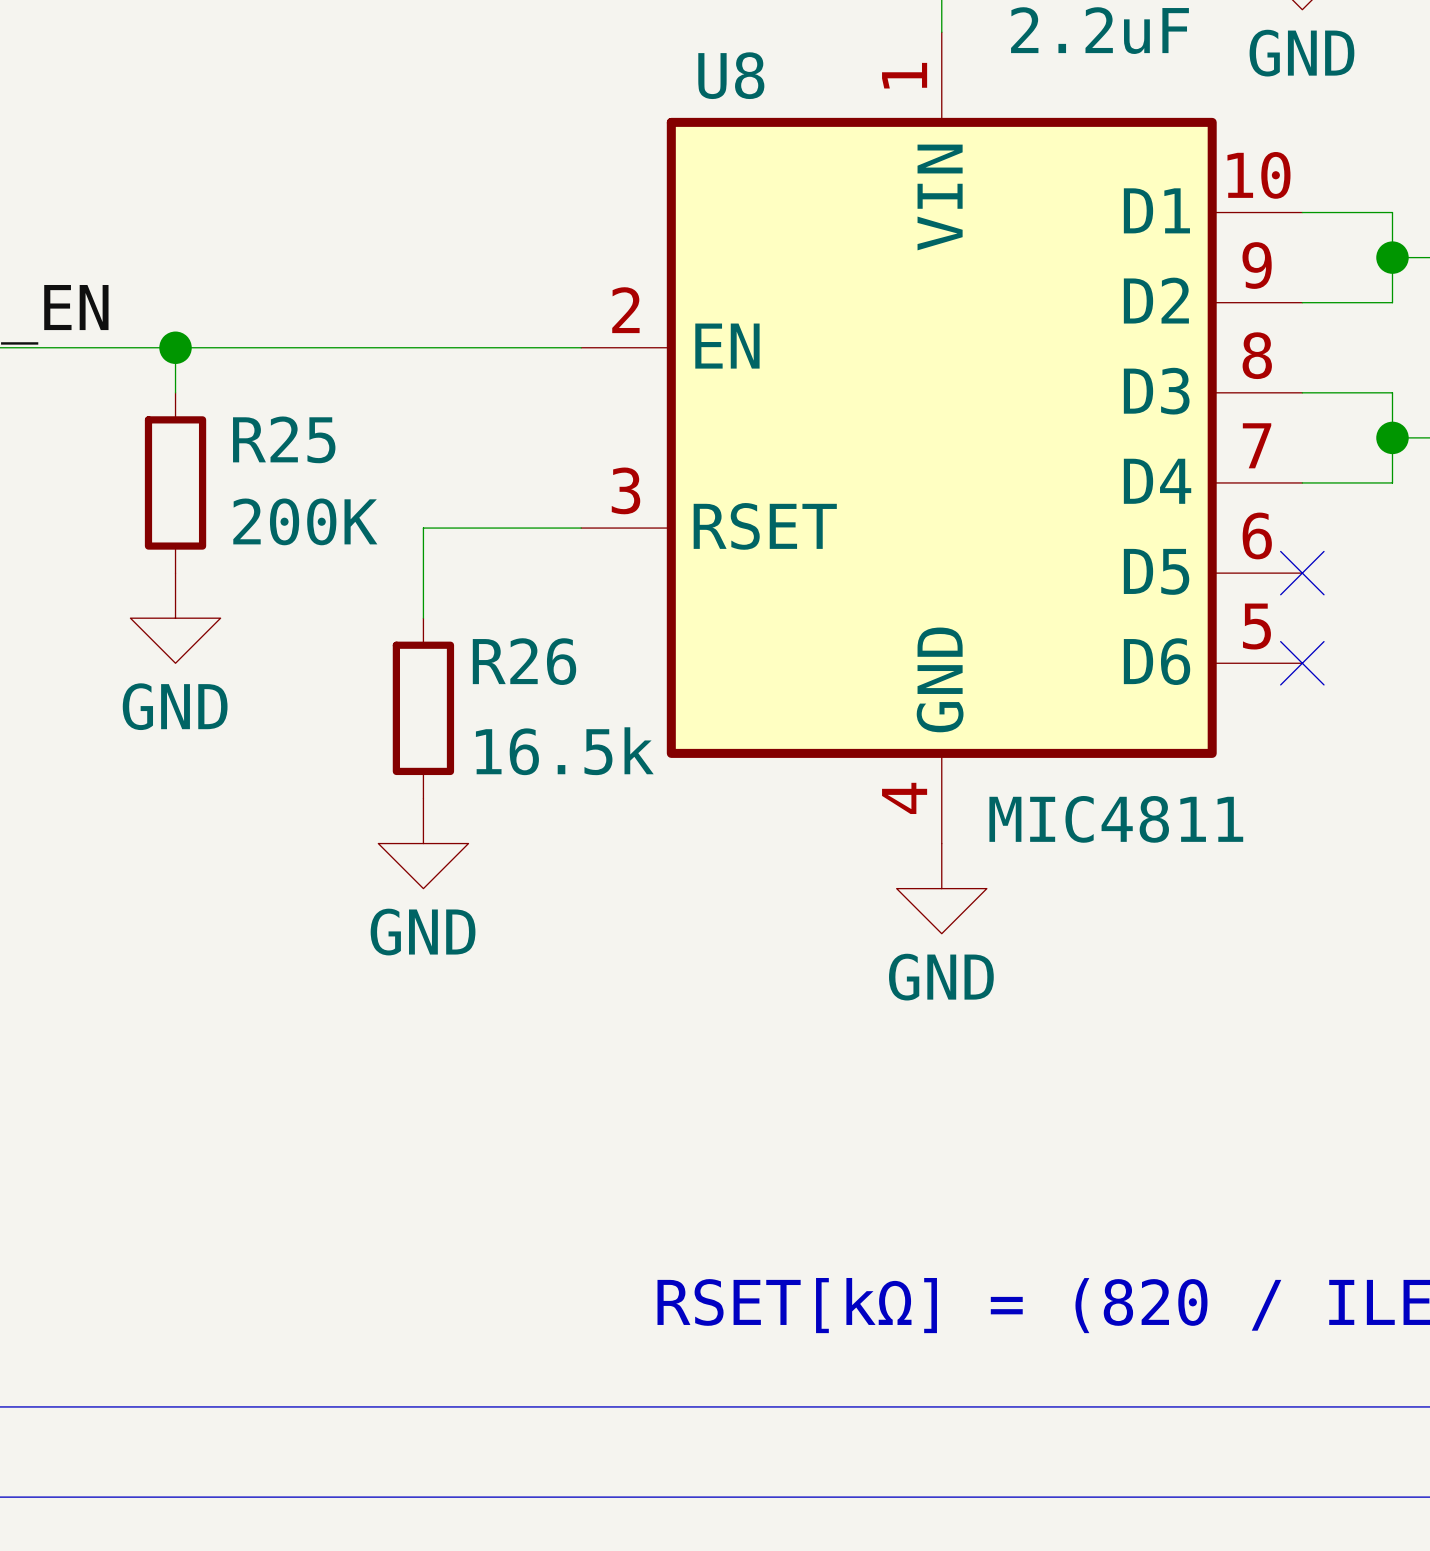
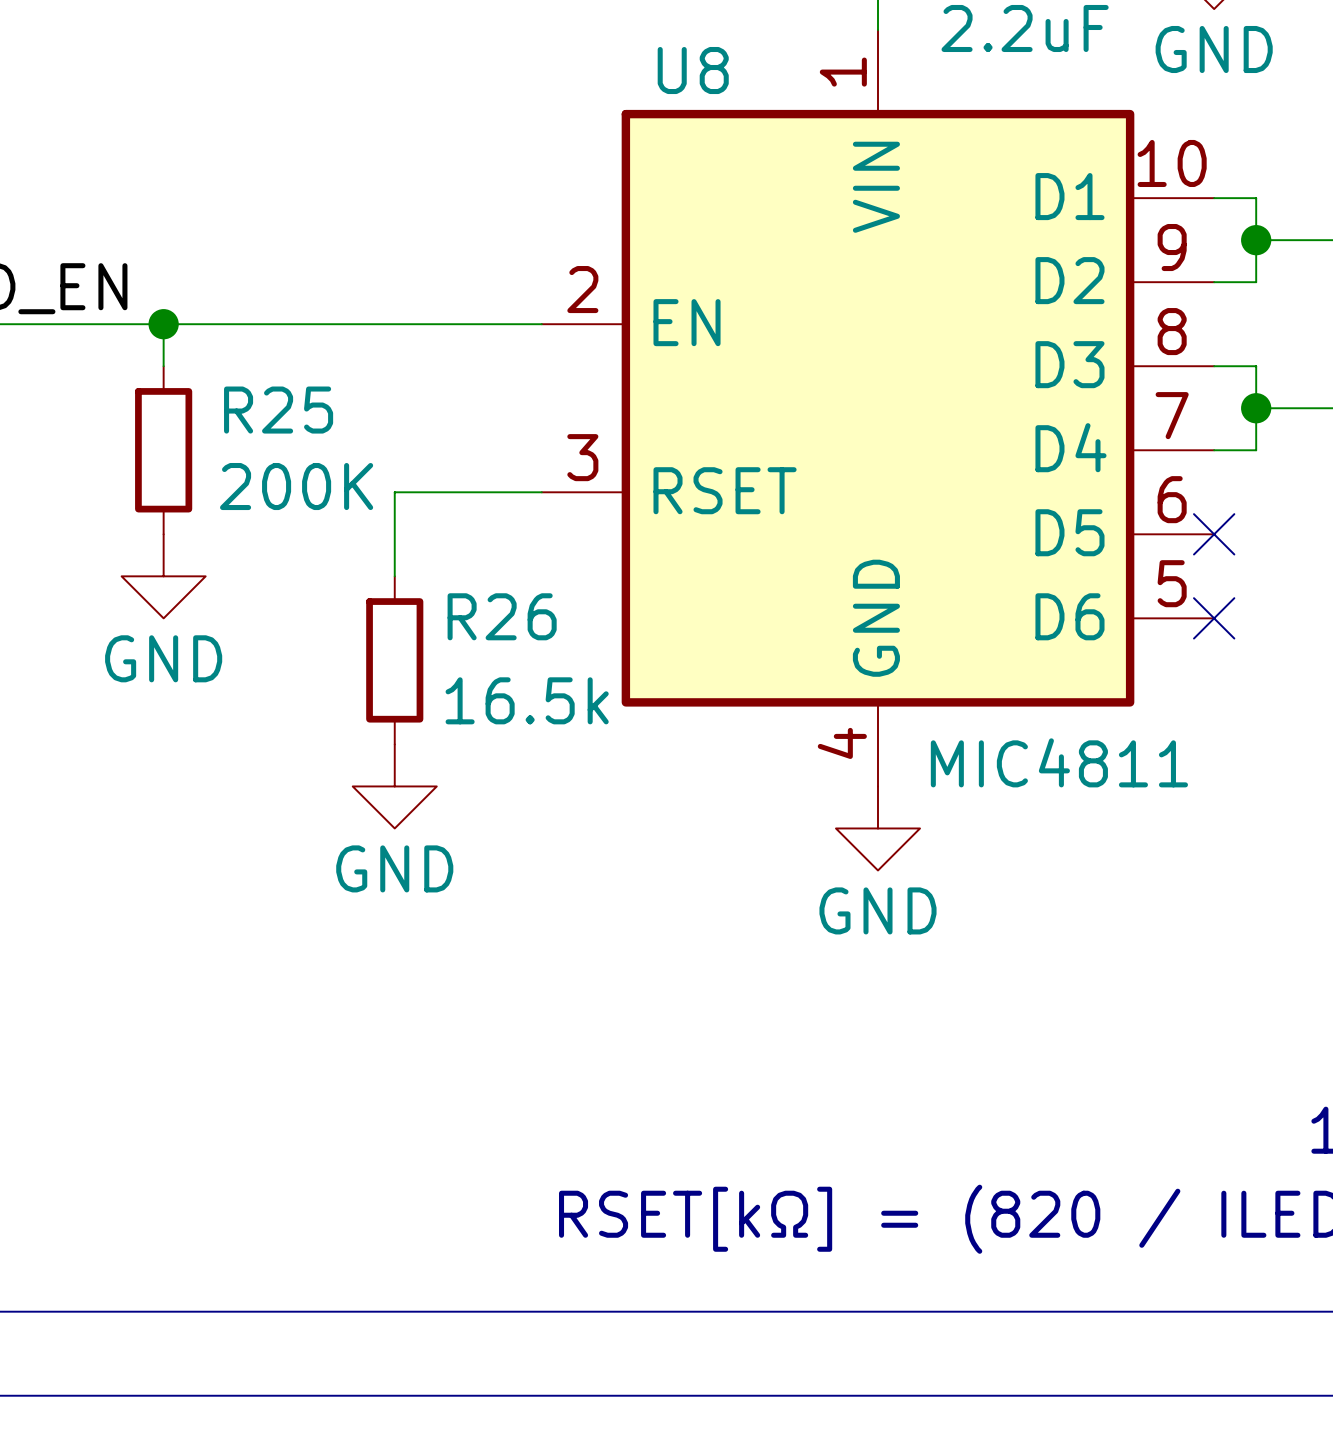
wire: (1347, 212) (1392, 212) (1392, 302) (1347, 302) -> (1256, 198) (1256, 282)
wire: none -> (1256, 240) (1298, 240)
junction position: (1392, 257) -> (1256, 240)
wire: (1347, 392) (1392, 392) (1392, 482) (1347, 482) -> (1256, 366) (1256, 450)
wire: none -> (1256, 408) (1298, 408)
junction position: (1392, 437) -> (1256, 408)

